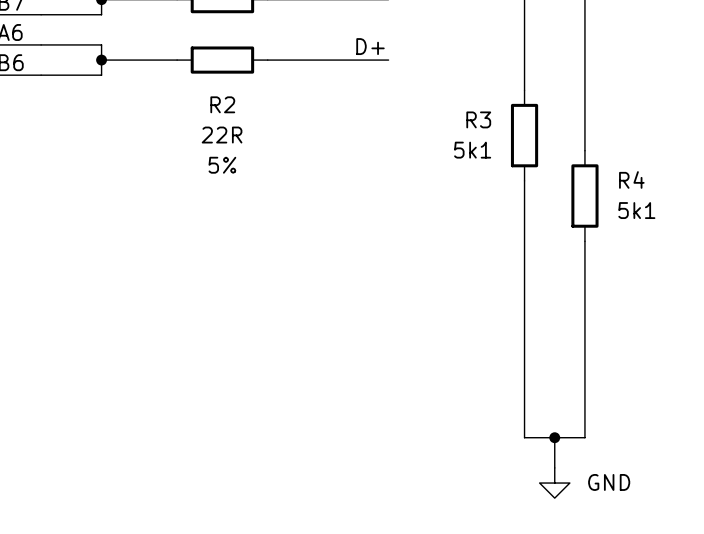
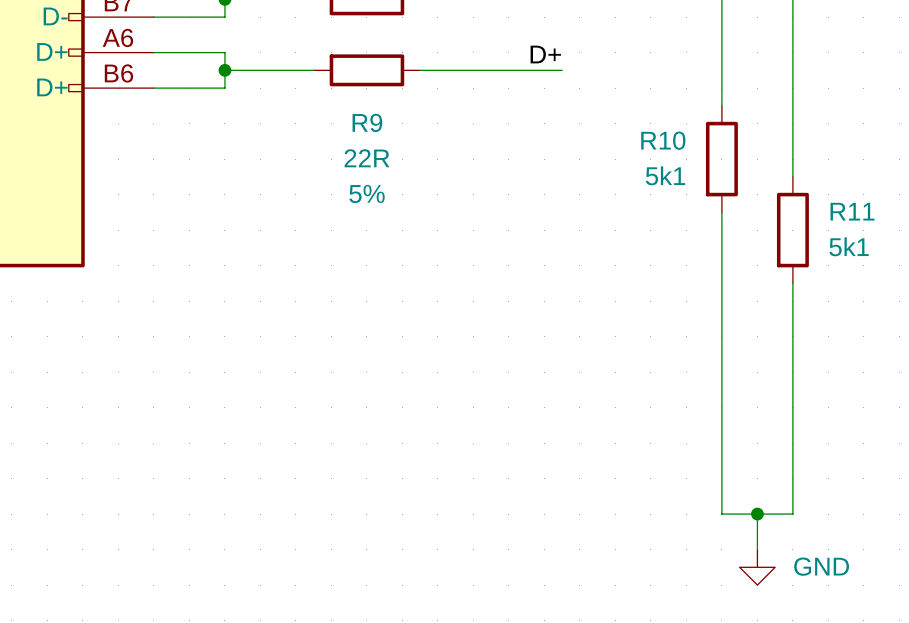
R2 name: R2 (222, 104) -> R9 (367, 122)
R3 name: R3 (478, 119) -> R10 (663, 140)
R4 name: R4 (631, 179) -> R11 (852, 211)

